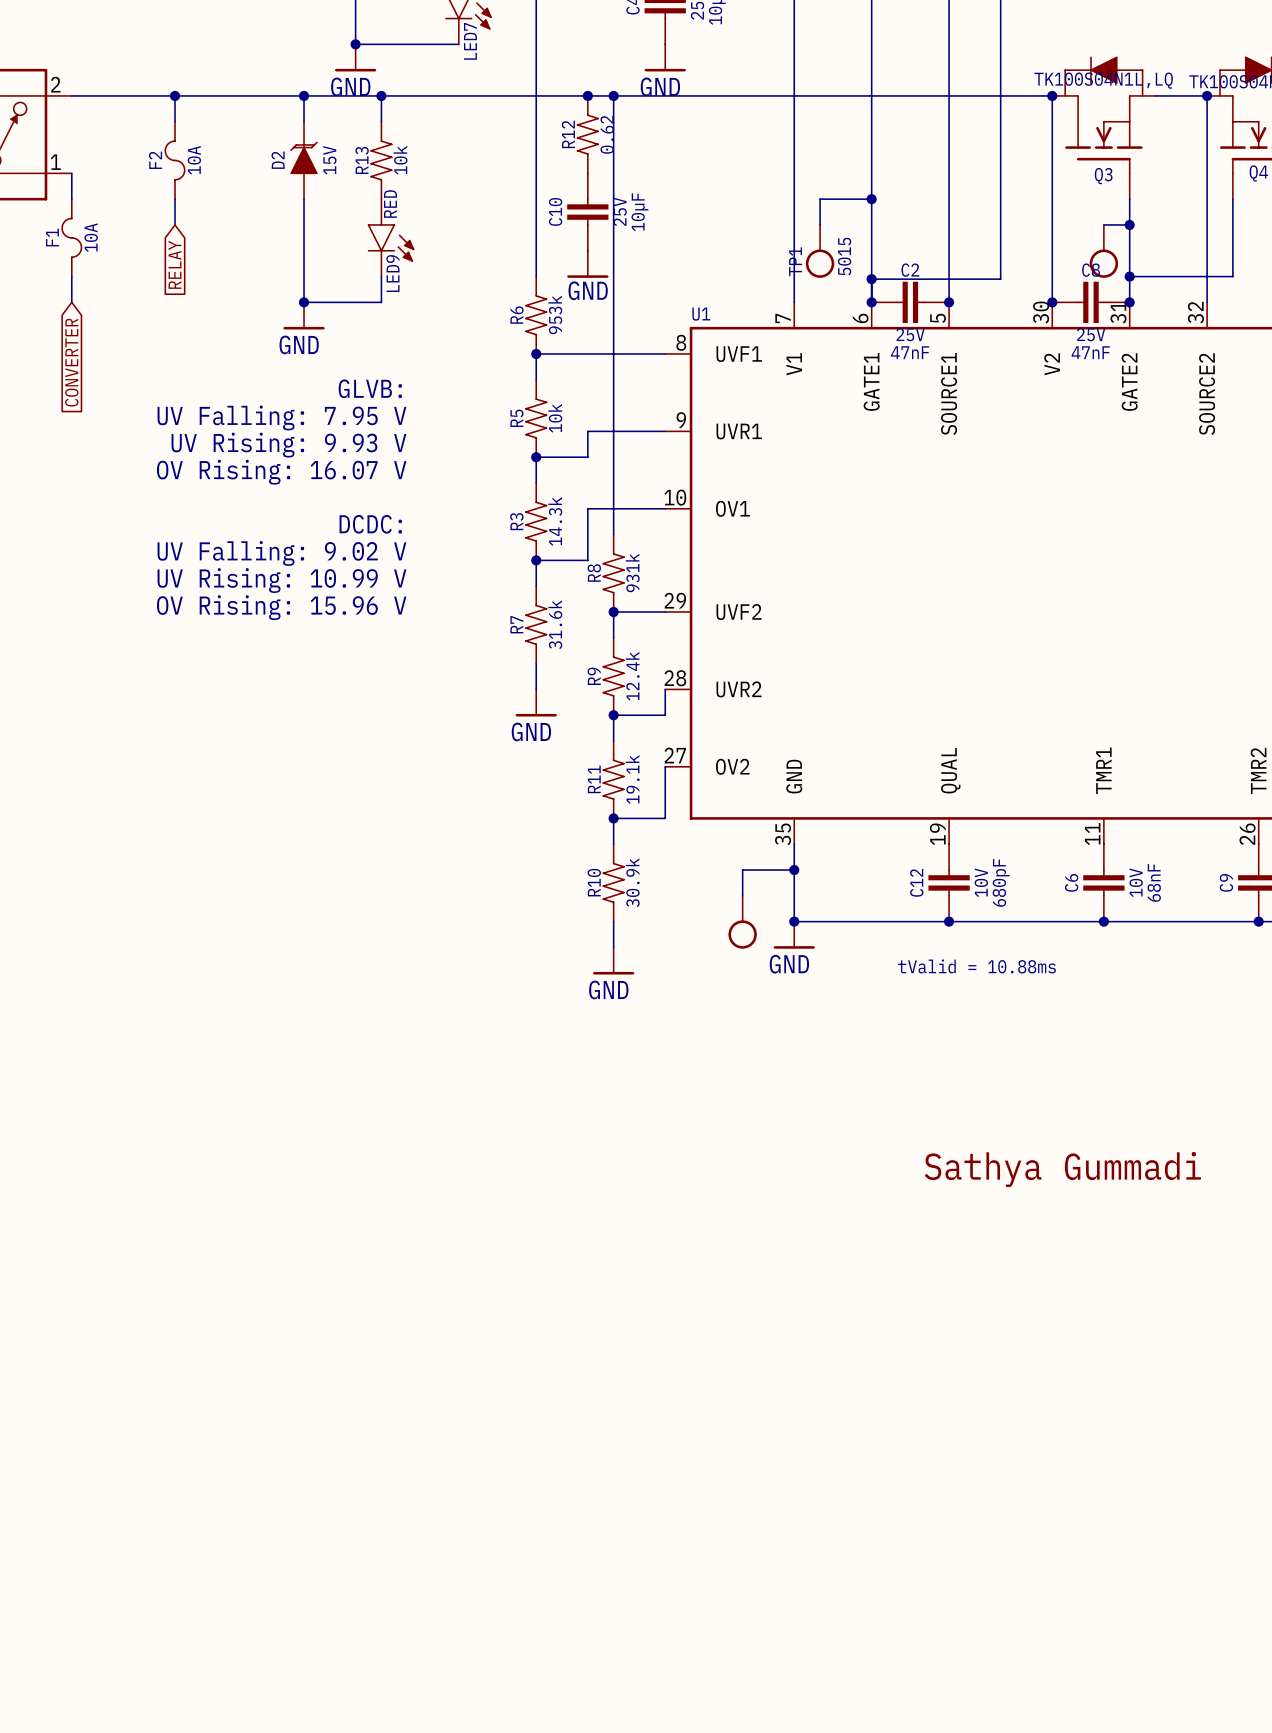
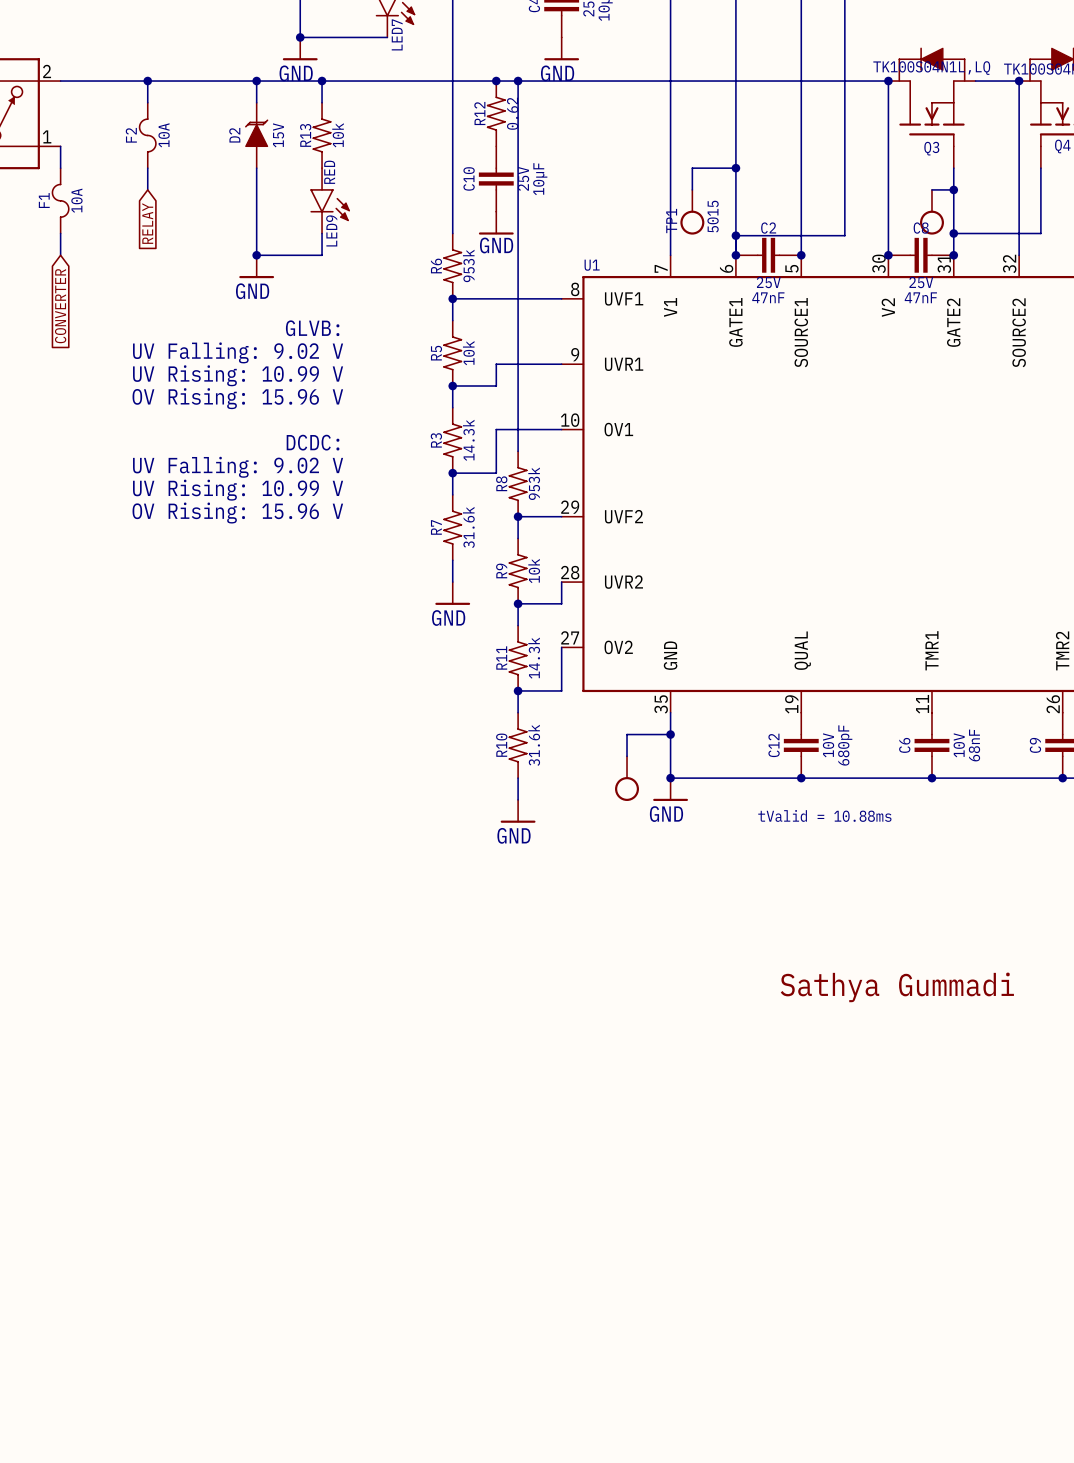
text: UV Falling: 7.95 V (281, 418) -> UV Falling: 9.02 V (238, 352)
text: UV Rising: 9.93 V (288, 445) -> UV Rising: 10.99 V (238, 375)
text: OV Rising: 16.07 V (281, 472) -> OV Rising: 15.96 V (237, 398)
R8 text: none -> 953k (534, 483)
R8 value: 931k (632, 572) -> none
R9 text: none -> 10k (534, 570)
R9 value: 12.4k (632, 676) -> none
R11 text: none -> 14.3k (534, 658)
R11 value: 19.1k (632, 779) -> none
R10 text: none -> 31.6k (534, 745)
R10 value: 30.9k (632, 882) -> none

